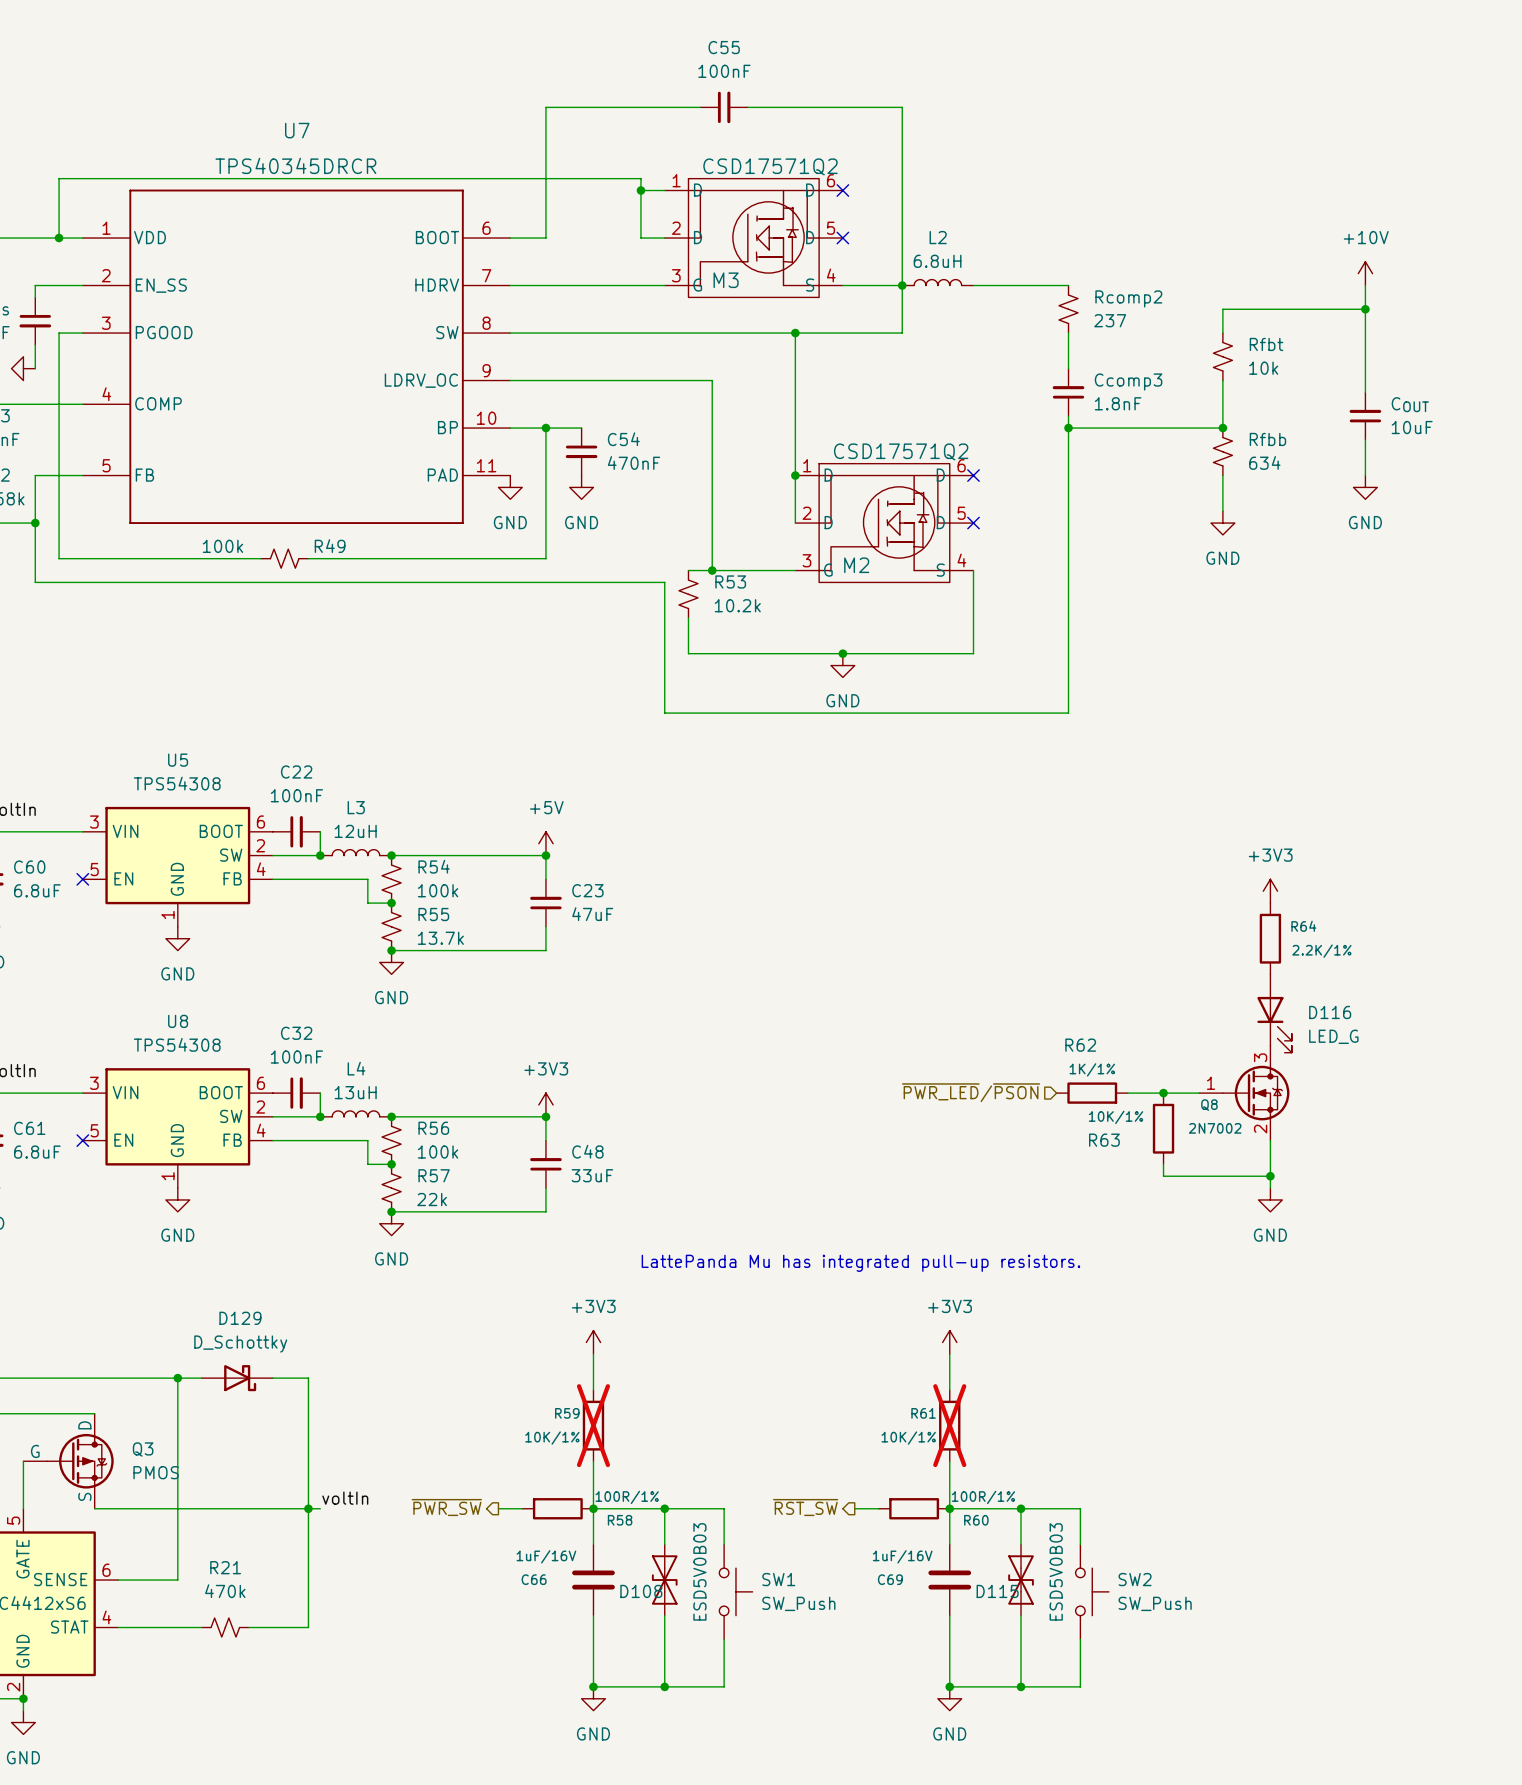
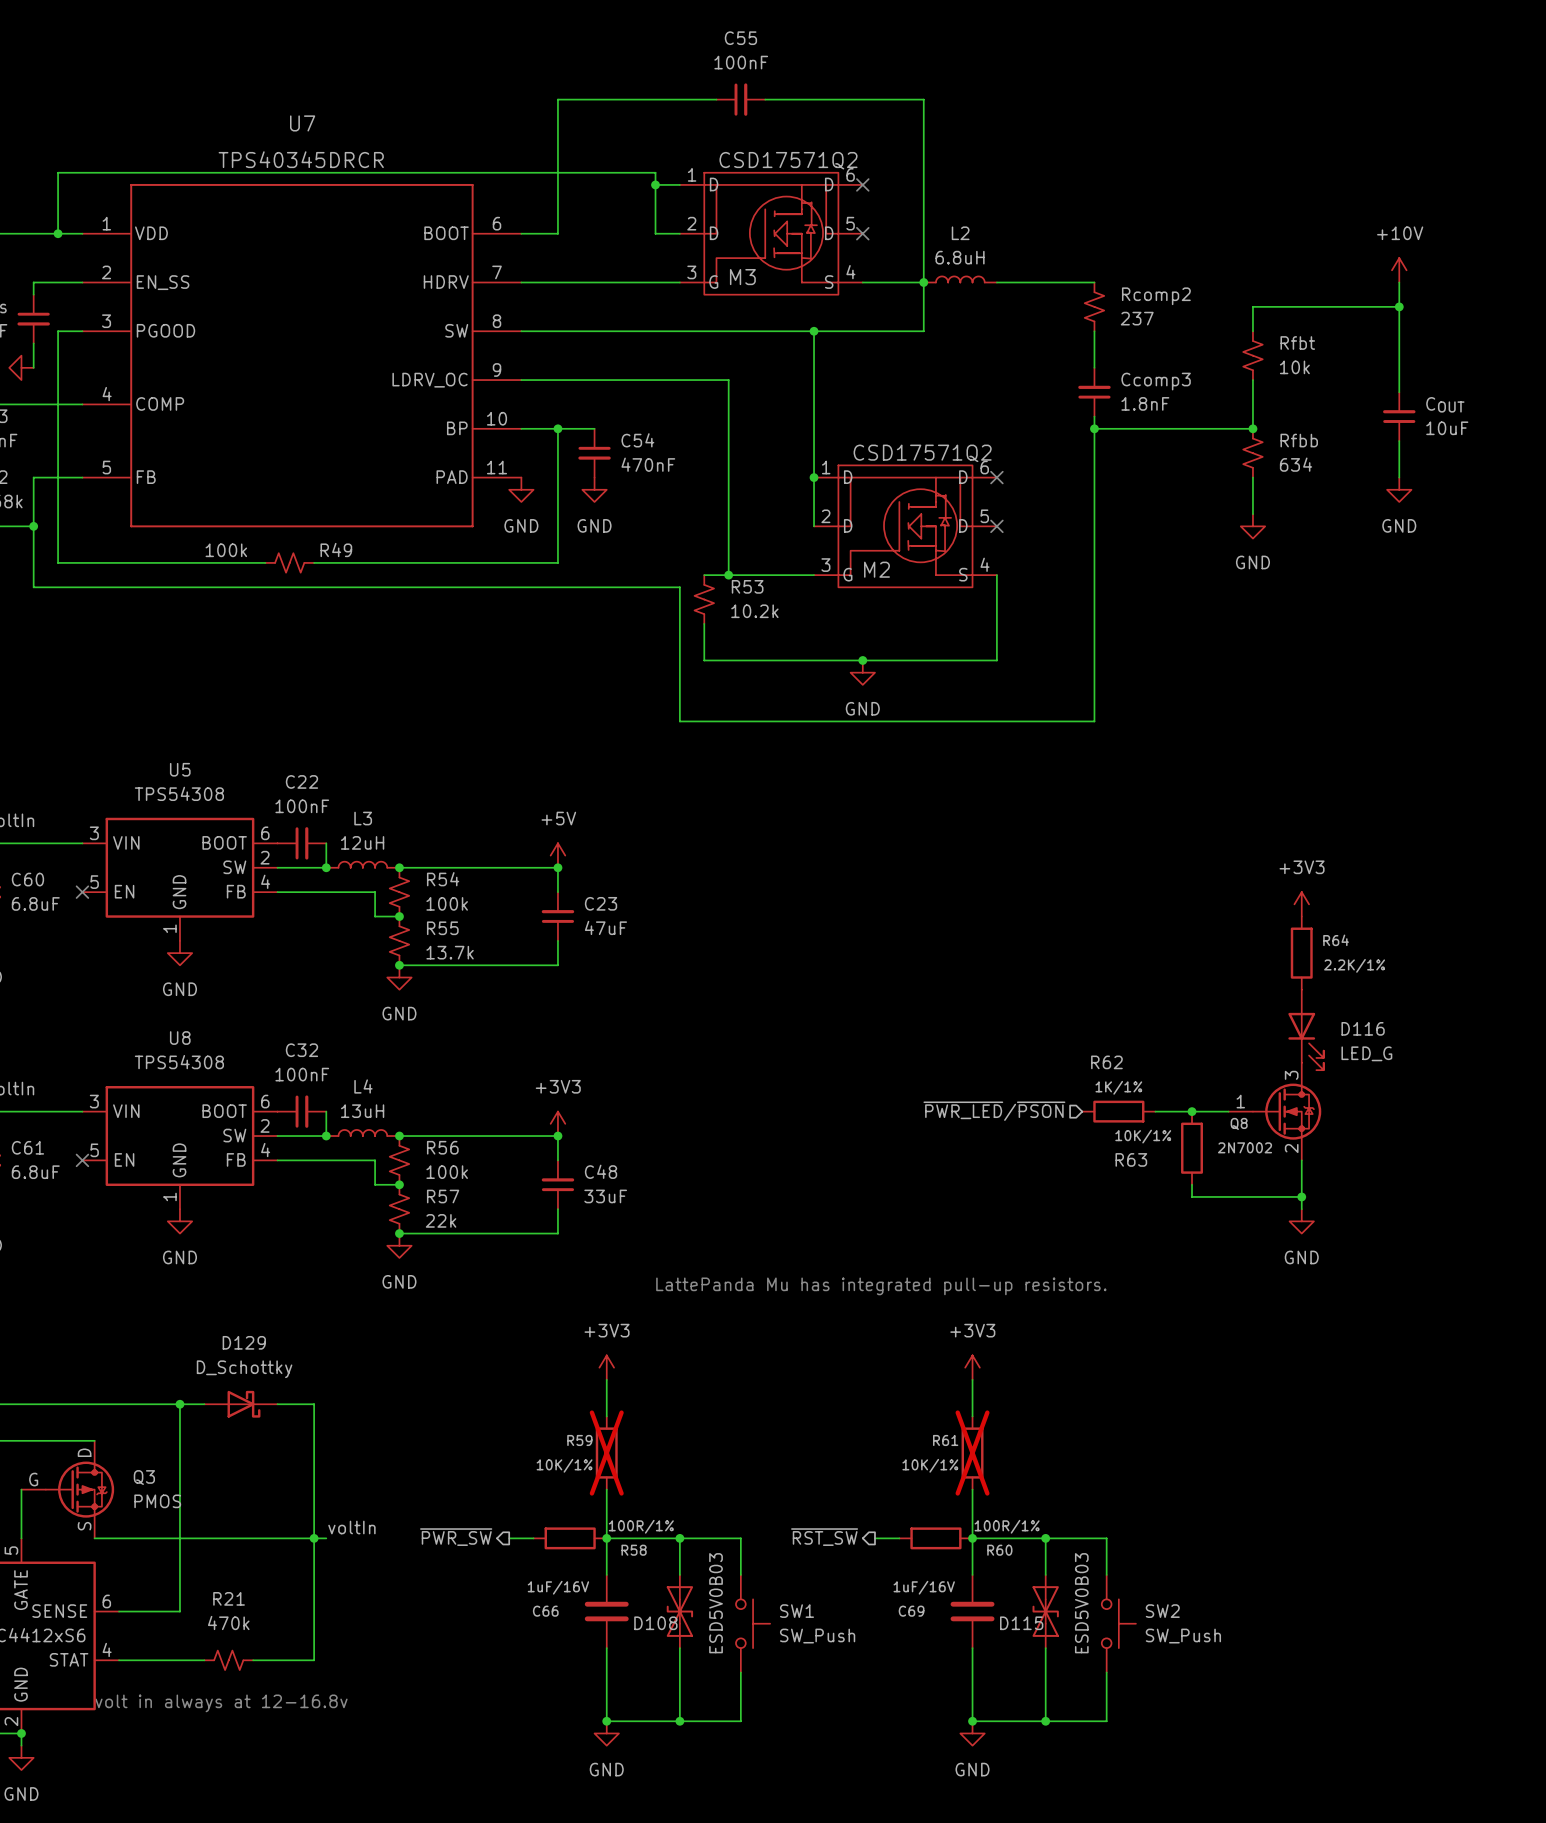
text: none -> volt in always at 12-16.8v (221, 1703)

